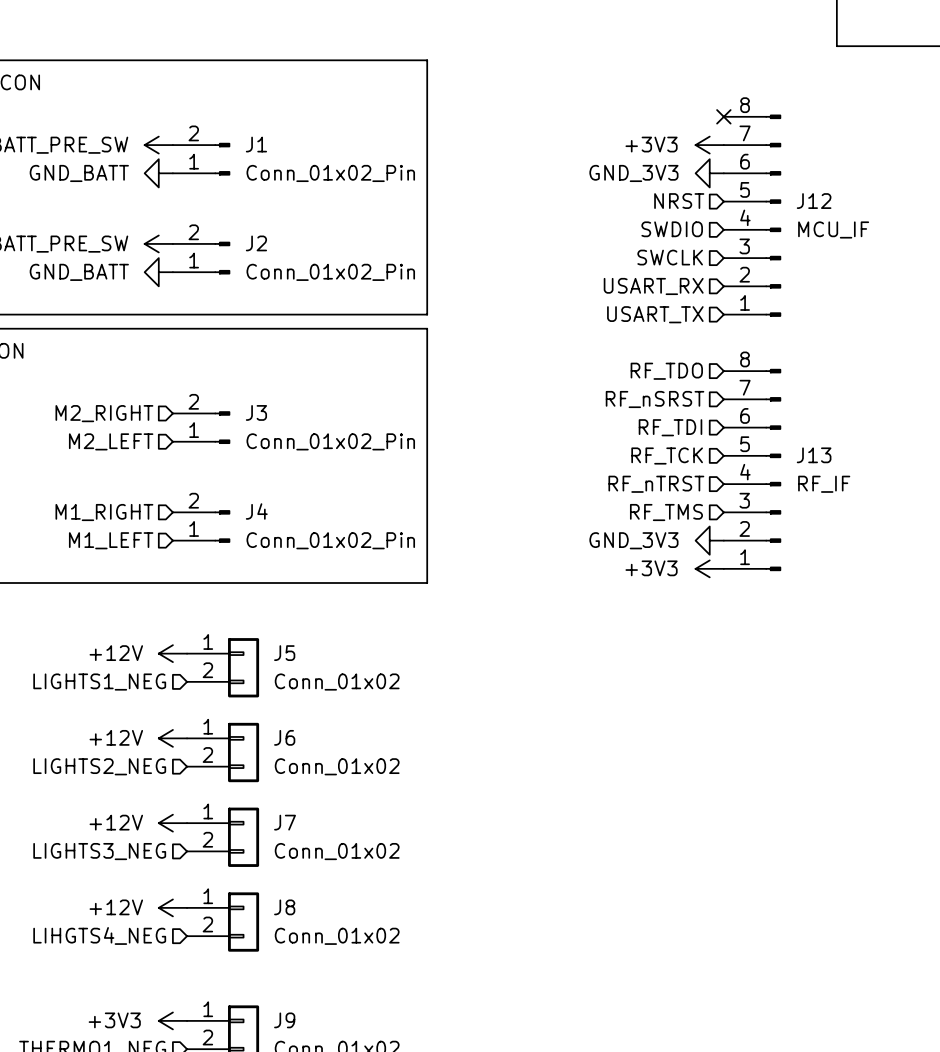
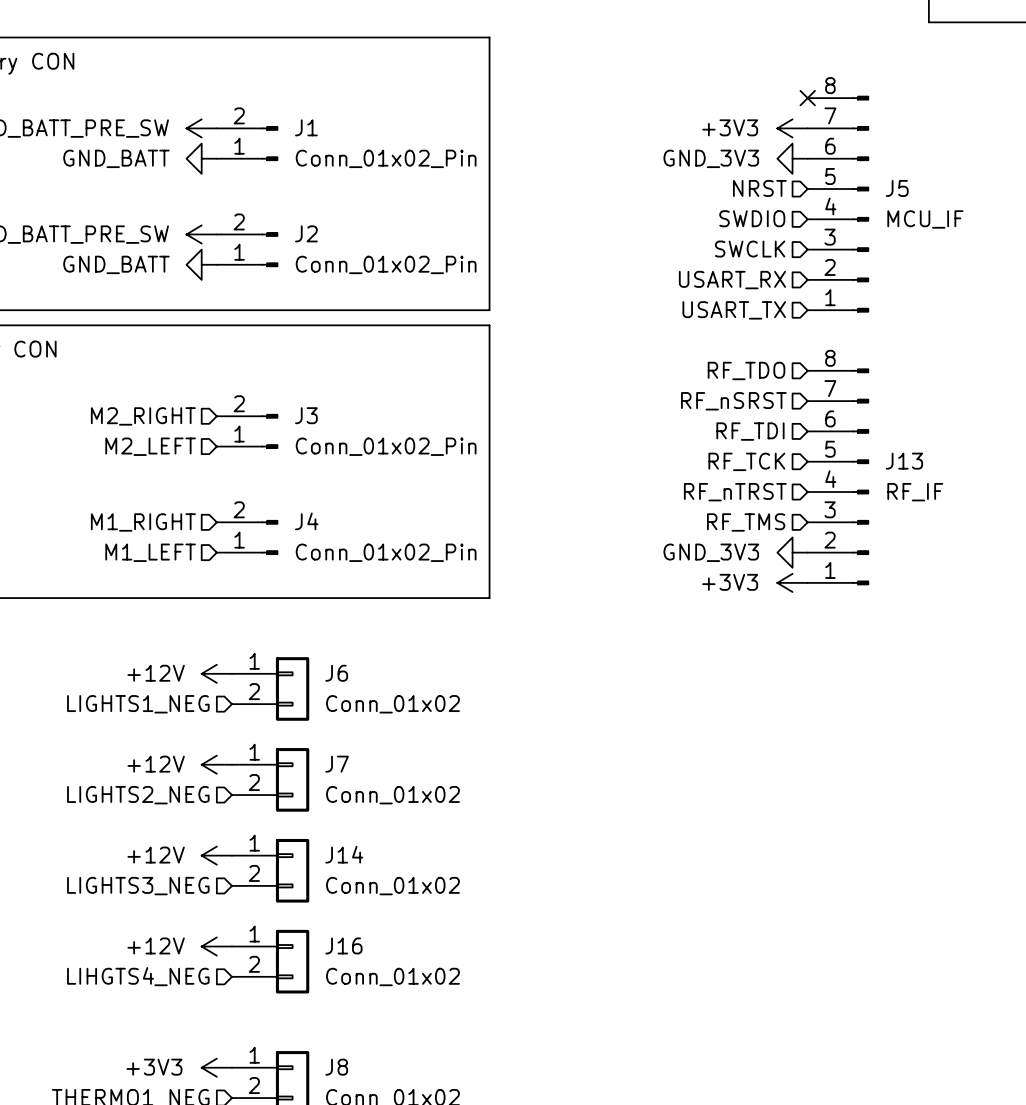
J12 name: J12 (814, 201) -> J5 (897, 188)
J5 name: J5 (284, 653) -> J6 (336, 673)
J6 name: J6 (284, 737) -> J7 (337, 764)
J7 name: J7 (285, 822) -> J14 (344, 854)
J8 name: J8 (284, 907) -> J16 (343, 945)
J9 name: J9 (284, 1020) -> J8 (336, 1067)

